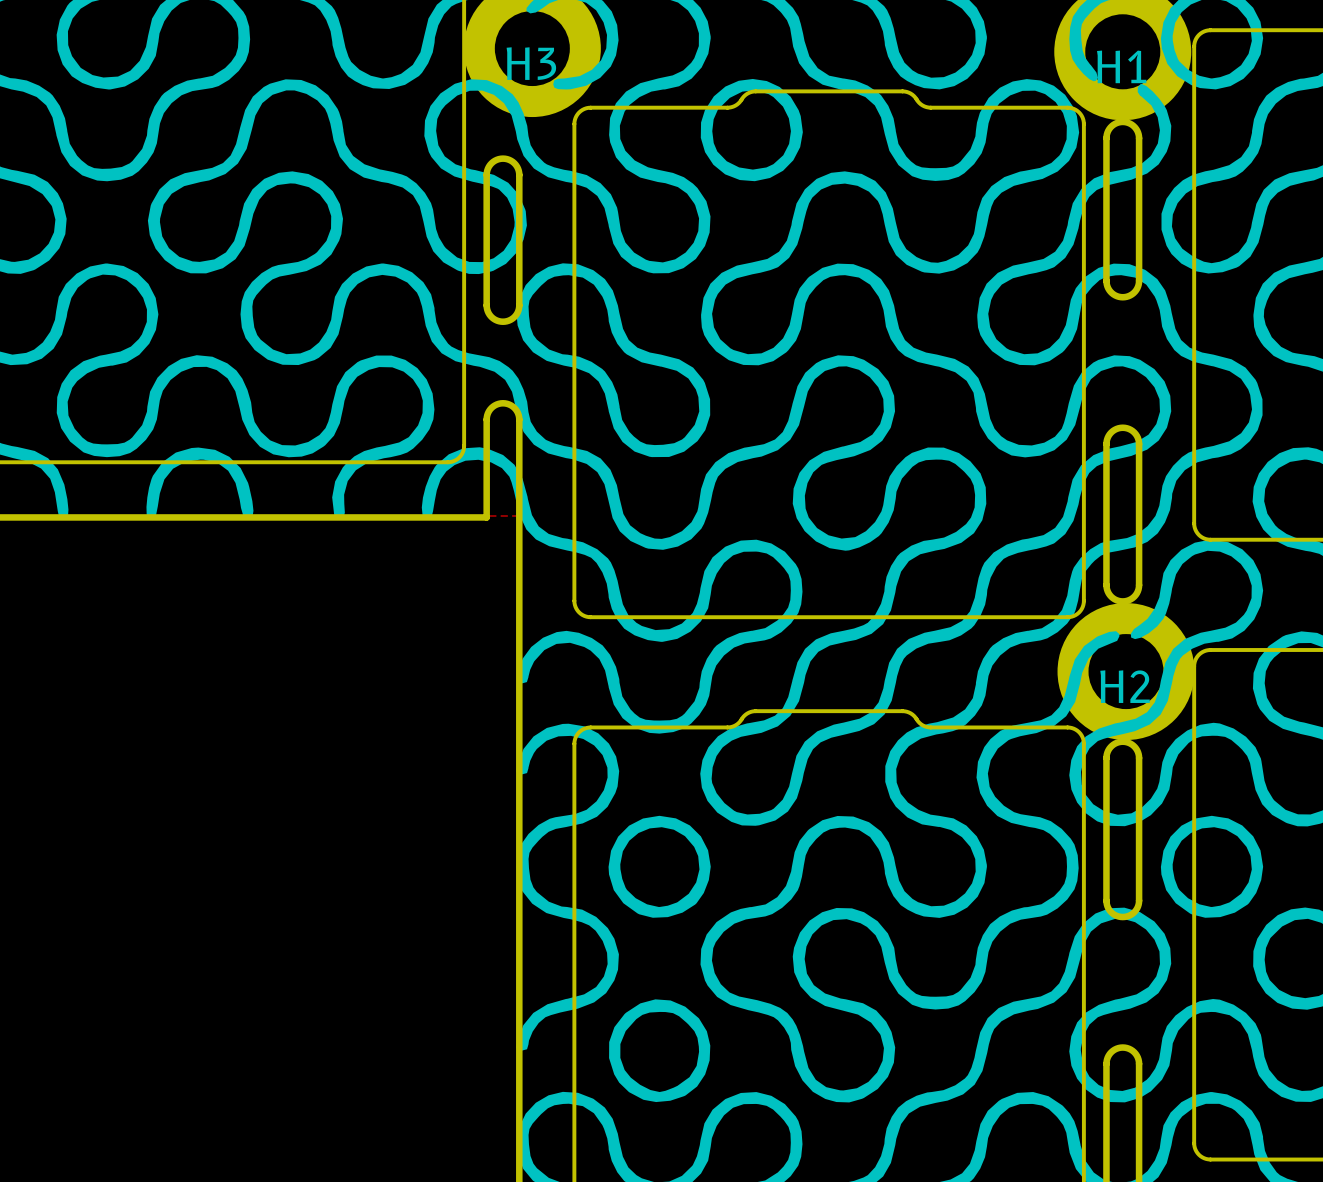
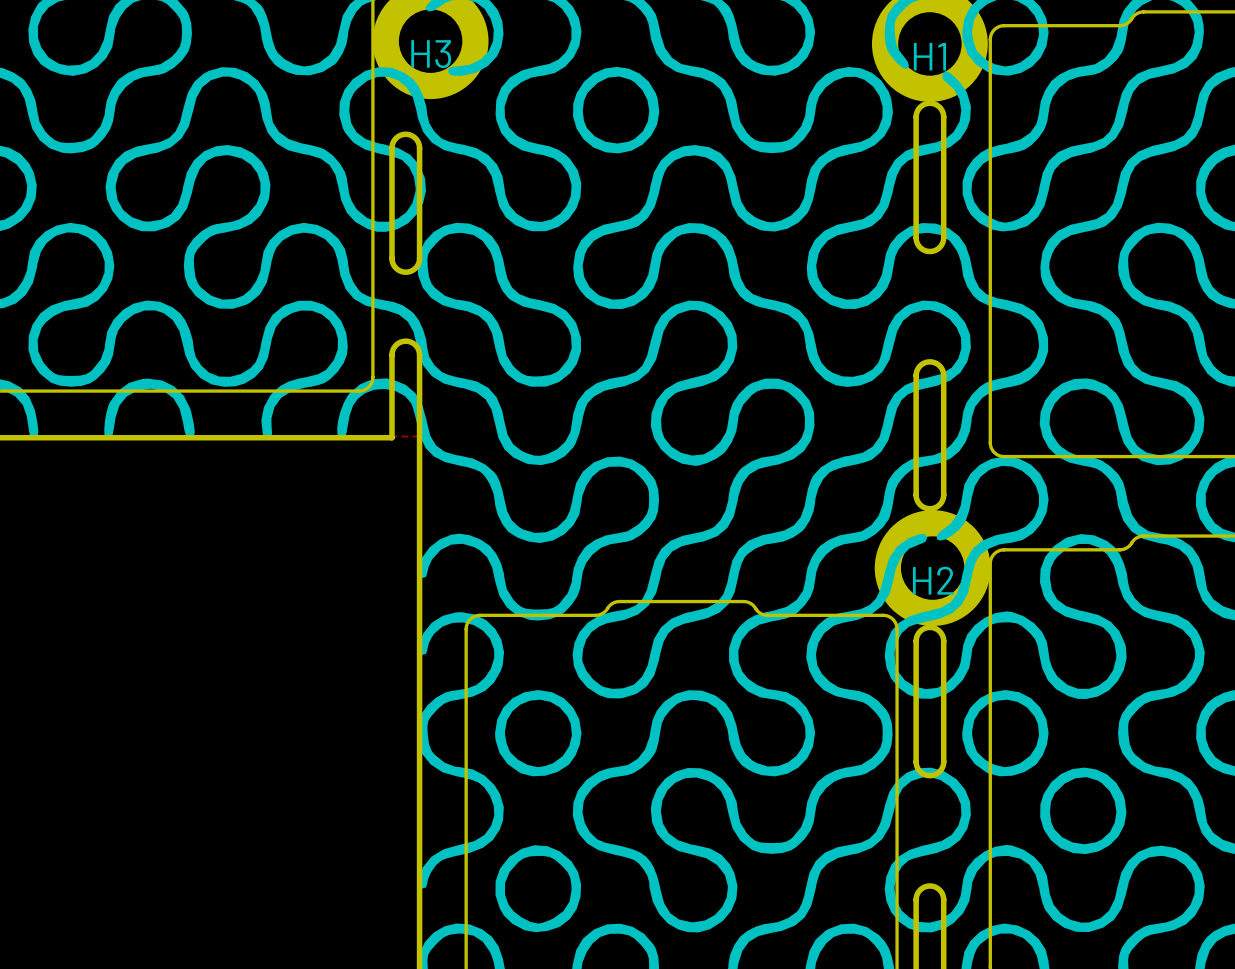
drawing: [572, 89, 1086, 620] -> none

